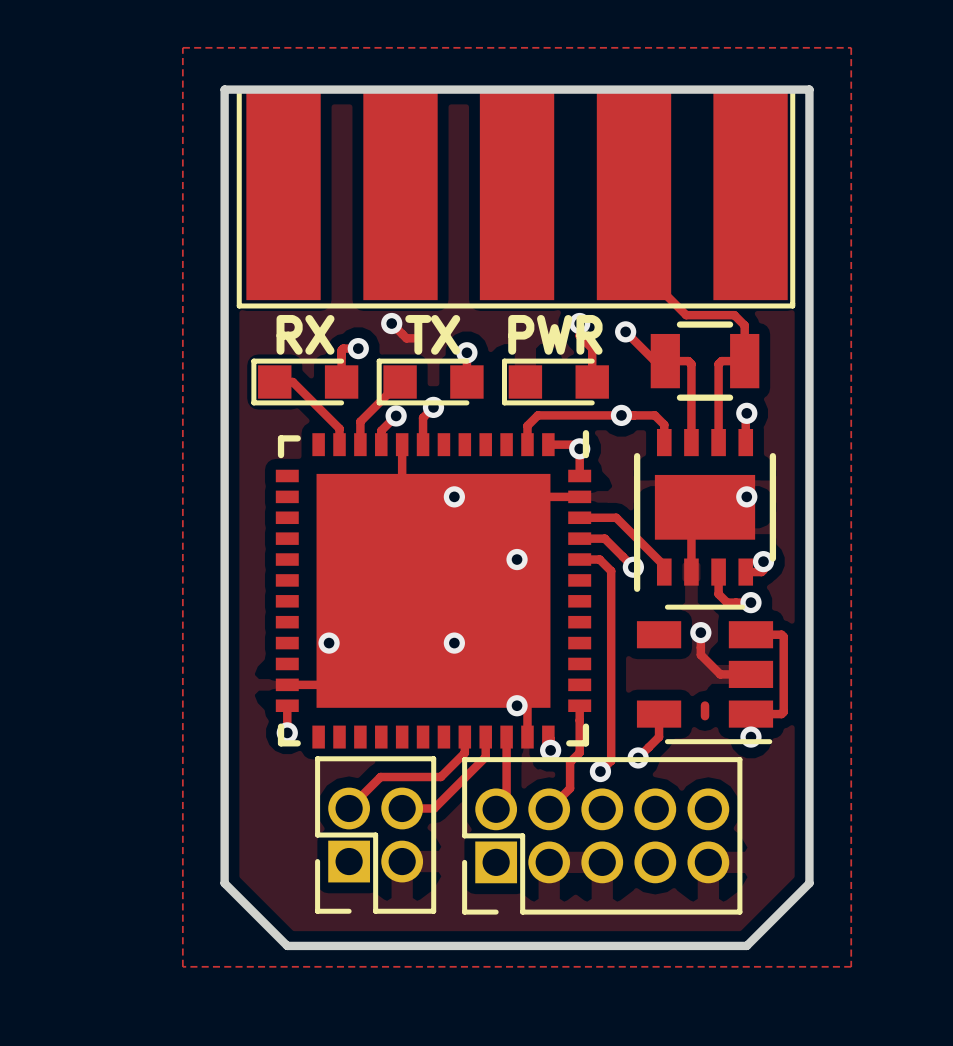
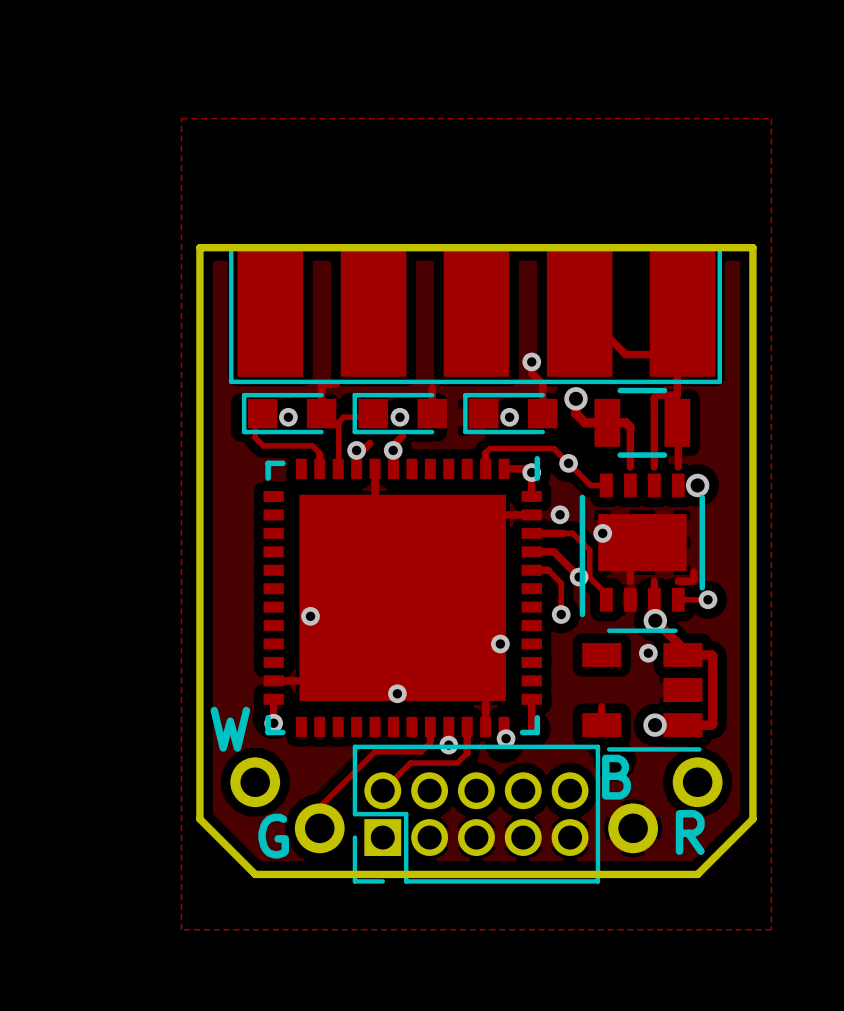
board edge: (224, 89) (224, 883) (287, 945) (746, 945) (809, 883) (809, 89) (224, 89) -> (199, 247) (199, 819) (255, 874) (697, 874) (752, 819) (752, 247) (199, 247)
part: (515, 198) -> none
part: none -> (475, 315)
track: (391, 323) (406, 338) (413, 338) -> none
via: (391, 323) -> none
track: (625, 331) (654, 361) (688, 361) (691, 364) (691, 397) -> (575, 398) (575, 413) (585, 422) (625, 422) (630, 427)
via: (625, 331) -> none
text: RX (305, 334) -> none
text: TX (432, 334) -> none
text: PWR (555, 334) -> none
via: (358, 348) -> none
via: (466, 352) -> none
part position: (705, 361) -> (642, 422)
via: none -> (575, 398)
track: (274, 382) (292, 382) (339, 428) -> (255, 417) (255, 437) (263, 445) (312, 445) (319, 454)
track: (400, 382) (360, 421) (360, 444) -> (363, 417) (343, 417) (338, 422) (338, 468)
via: none -> (288, 417)
via: none -> (399, 417)
via: none -> (509, 417)
via position: (433, 407) -> (393, 450)
via: (746, 413) -> none
via position: (396, 415) -> (356, 450)
via position: (621, 415) -> (568, 463)
track: (527, 426) (537, 415) (654, 415) (664, 424) (664, 442) -> (485, 453) (490, 448) (553, 448) (590, 485) (606, 485)
via: none -> (697, 485)
via: (454, 496) -> none
via: none -> (560, 514)
via: (746, 496) -> none
part position: (705, 510) -> (642, 545)
track: (616, 517) (664, 565) (663, 574) -> (563, 533) (572, 533) (589, 550) (589, 577) (606, 594) (606, 599)
via: none -> (602, 533)
via: (517, 559) -> none
track: (598, 559) (611, 571) (611, 760) (600, 771) -> (548, 570) (561, 583) (561, 614)
via: (763, 561) -> none
track: none -> (678, 599) (708, 599)
via: none -> (708, 599)
track: (718, 594) (727, 602) (750, 602) -> (654, 599) (654, 619) (682, 648) (682, 655) (712, 655) (712, 724) (655, 725)
via: (750, 602) -> none
via: none -> (561, 614)
via: none -> (655, 620)
track: (700, 632) (700, 654) (720, 674) (750, 674) -> none
via position: (700, 632) -> (648, 653)
track: (750, 634) (781, 634) (783, 636) (783, 711) (781, 714) (750, 714) (750, 737) -> none
via position: (329, 643) -> (310, 616)
via: (454, 643) -> none
via: none -> (500, 644)
part position: (705, 674) -> (642, 690)
via: none -> (397, 693)
via: (517, 705) -> none
track: (705, 705) (705, 716) -> none
via: none -> (655, 725)
track: (659, 737) (638, 757) -> none
via: (750, 737) -> none
text: none -> W (230, 729)
track: (579, 739) (579, 752) (570, 762) (570, 788) (549, 809) -> none
track: (464, 753) (440, 777) (380, 777) (349, 808) -> (430, 741) (421, 751) (375, 751) (319, 807) (319, 828)
part footprint: [315, 756, 437, 914] -> [294, 803, 345, 854]
track: (485, 757) (434, 808) (402, 808) -> none
via: none -> (448, 745)
via: (638, 757) -> none
track: (506, 766) (506, 798) (496, 809) -> (467, 753) (457, 763) (410, 763) (382, 790)
via: (600, 771) -> none
text: none -> B (616, 777)
part: none -> (255, 782)
part: none -> (697, 782)
part position: (602, 835) -> (476, 814)
part: none -> (633, 828)
text: none -> R (690, 832)
text: none -> G (273, 836)

